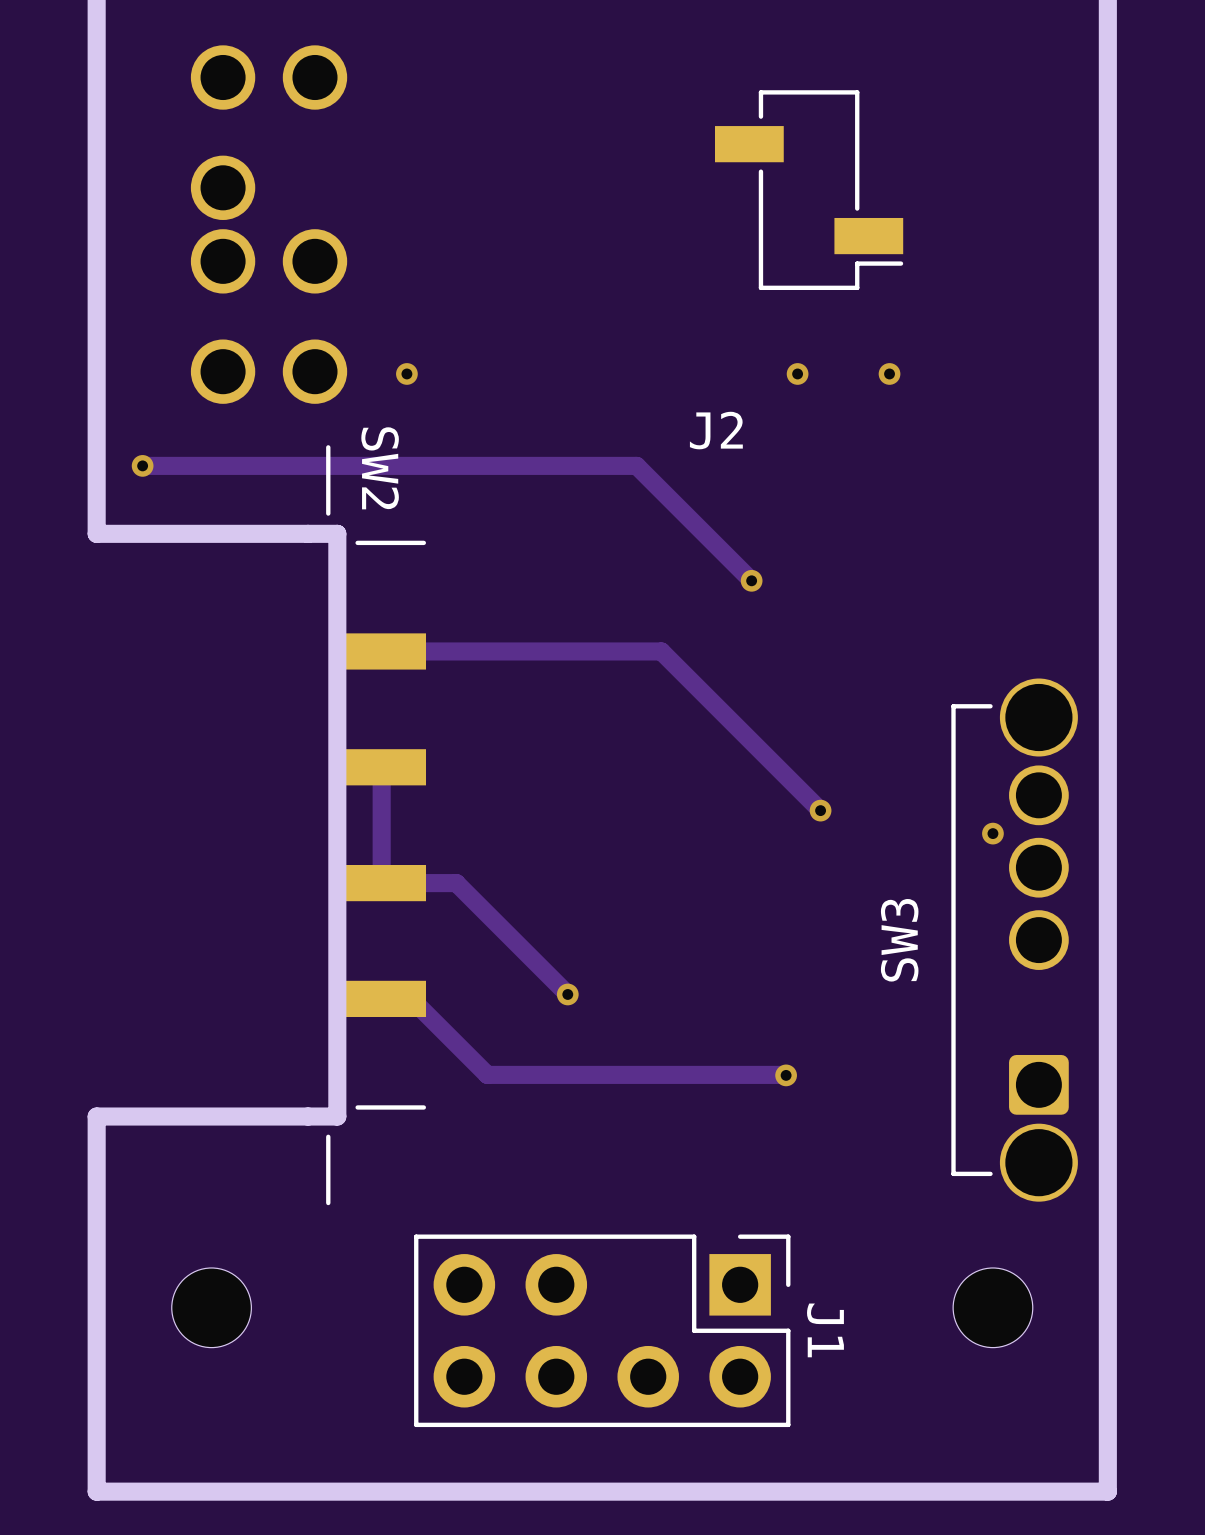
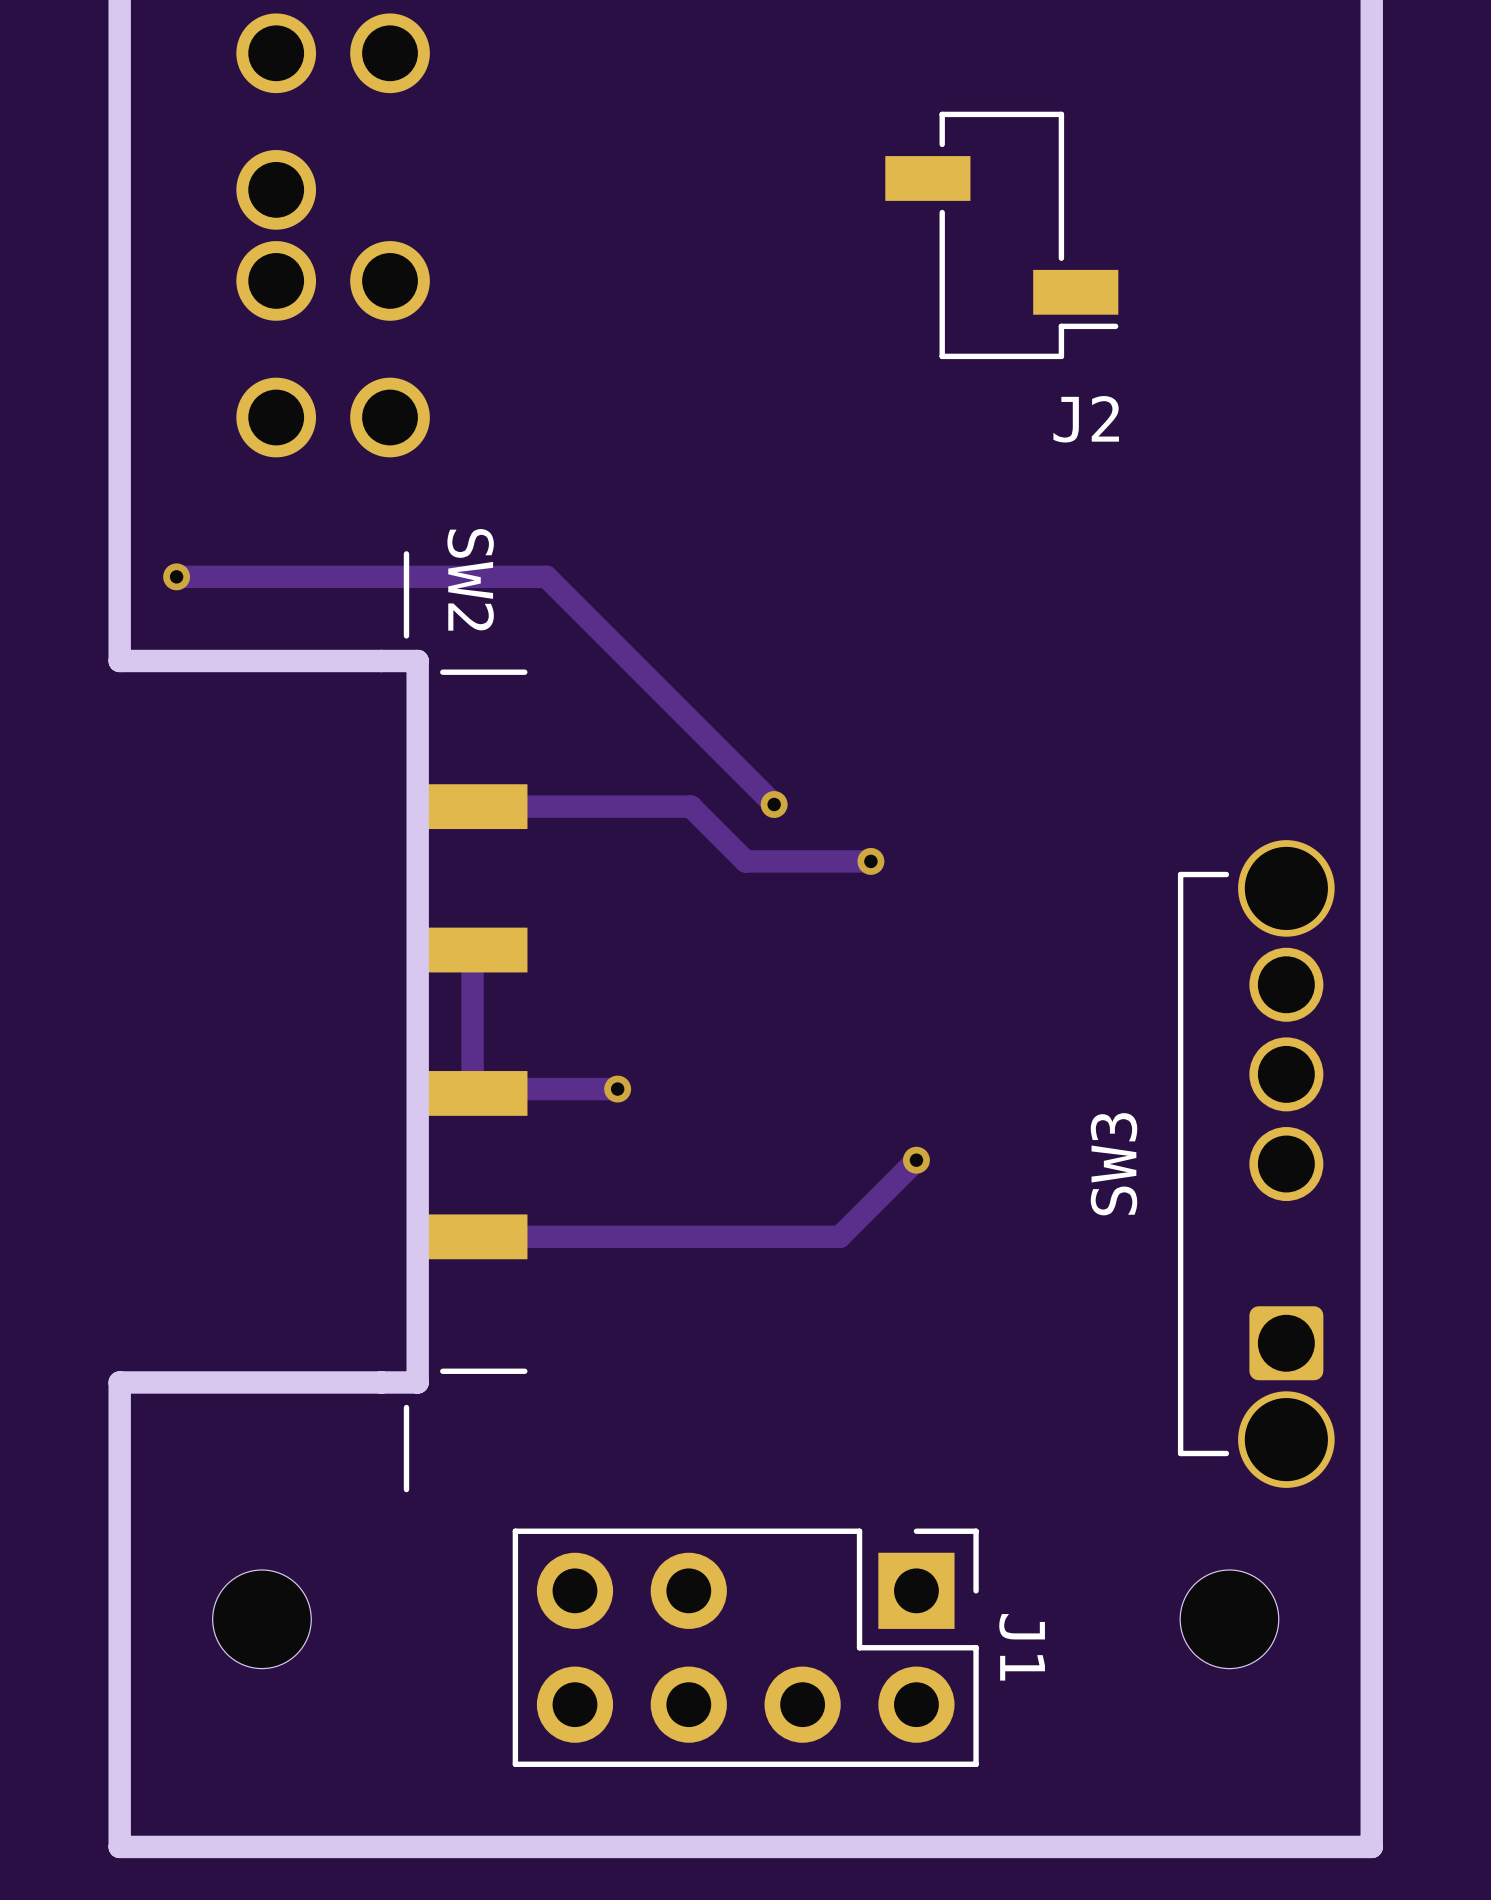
part position: (269, 224) -> (333, 235)
via: (406, 373) -> none
via: (797, 373) -> none
via: (889, 373) -> none
J2 name position: J2 (716, 430) -> J2 (1086, 419)
track: (441, 465) (636, 465) (751, 580) -> (546, 576) (774, 804)
via: (751, 580) -> none
via: none -> (774, 804)
track: (558, 651) (661, 651) (820, 810) -> (690, 806) (745, 861) (870, 861)
via: none -> (870, 861)
via: (820, 810) -> none
via: (992, 833) -> none
via: none -> (617, 1089)
track: (381, 883) (456, 883) (567, 994) -> (472, 1093) (476, 1089) (617, 1089)
via: none -> (916, 1160)
via: (567, 994) -> none
track: (411, 998) (487, 1074) (785, 1074) -> (509, 1236) (839, 1236) (916, 1160)
via: (786, 1075) -> none

